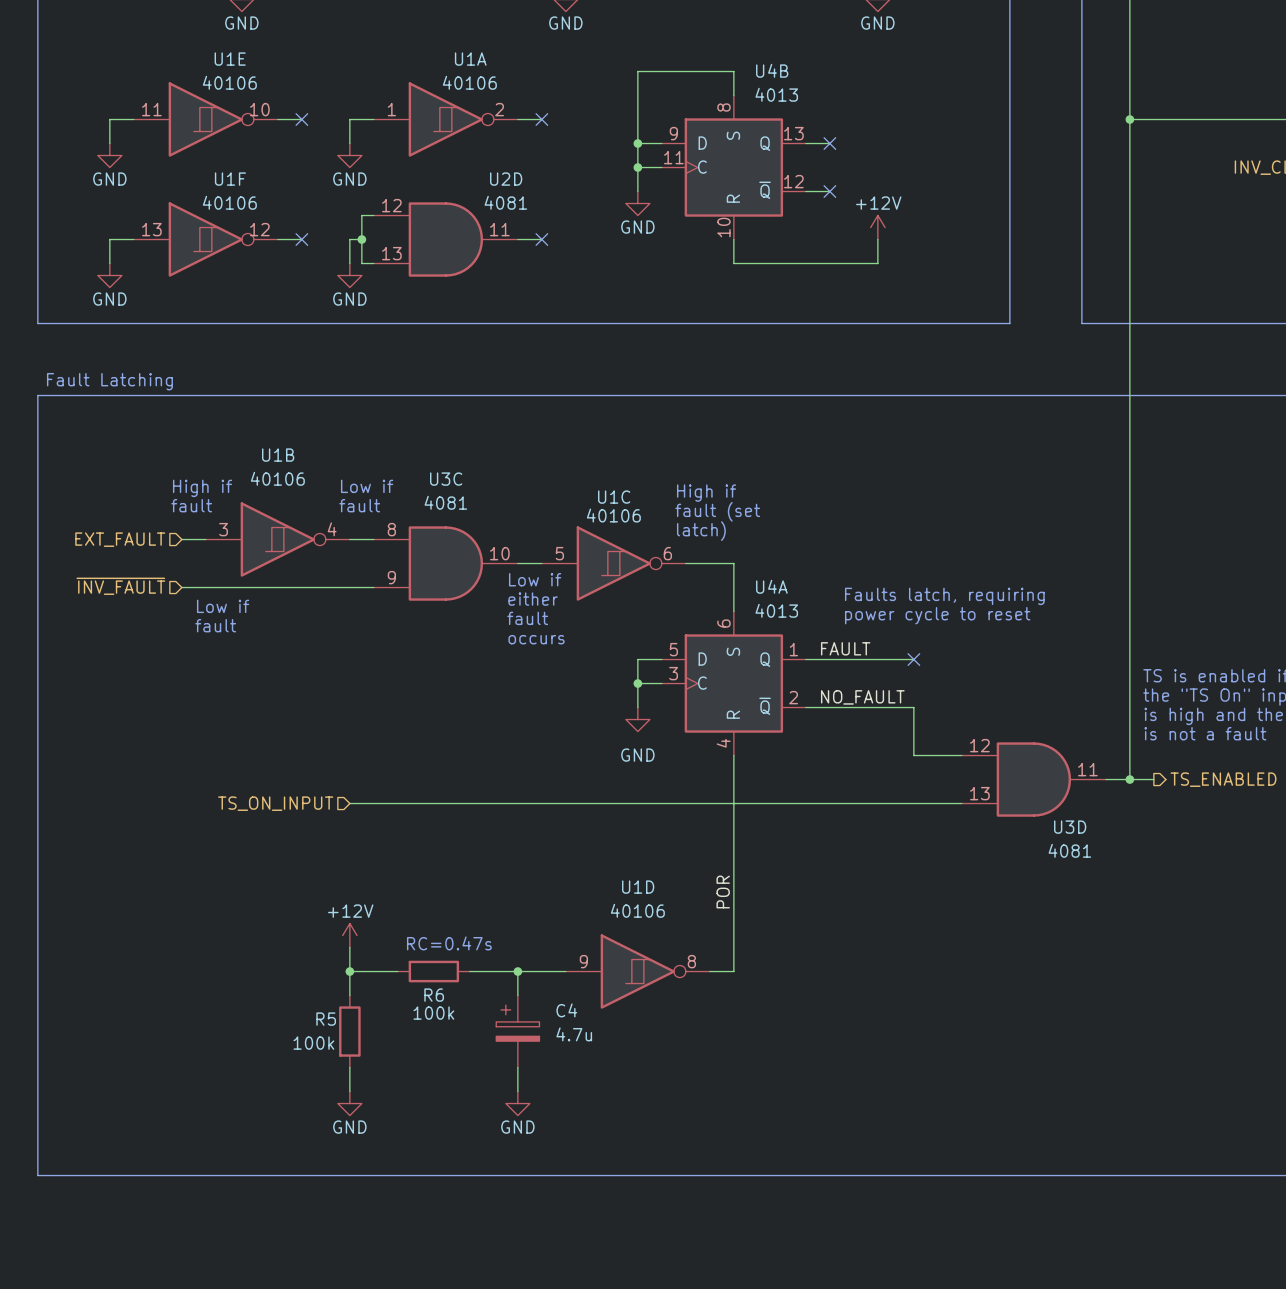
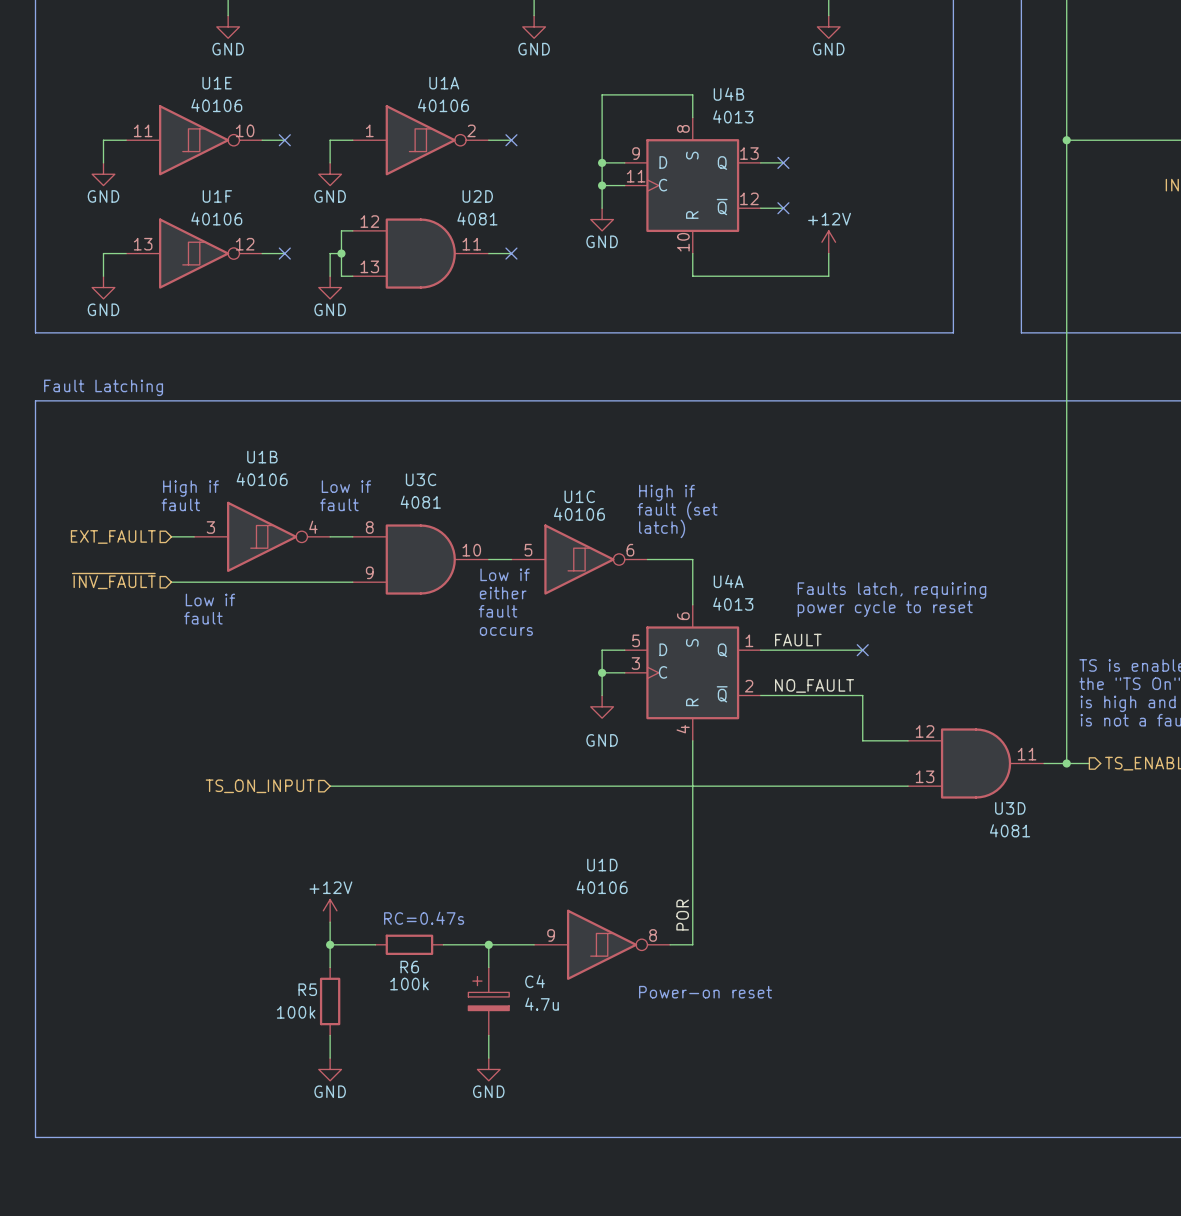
label position: POR (723, 892) -> POR (682, 915)
text: none -> Power-on reset (705, 992)

